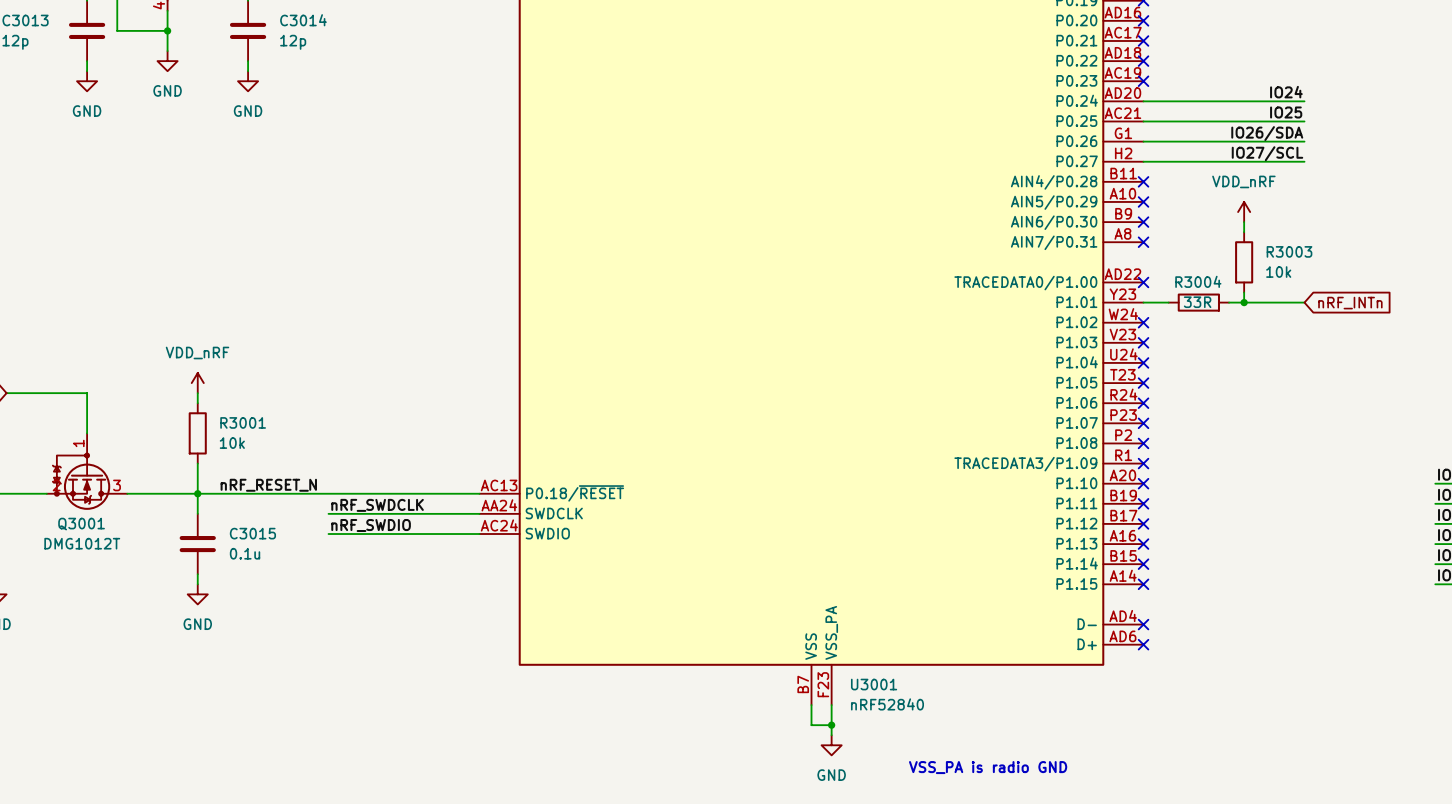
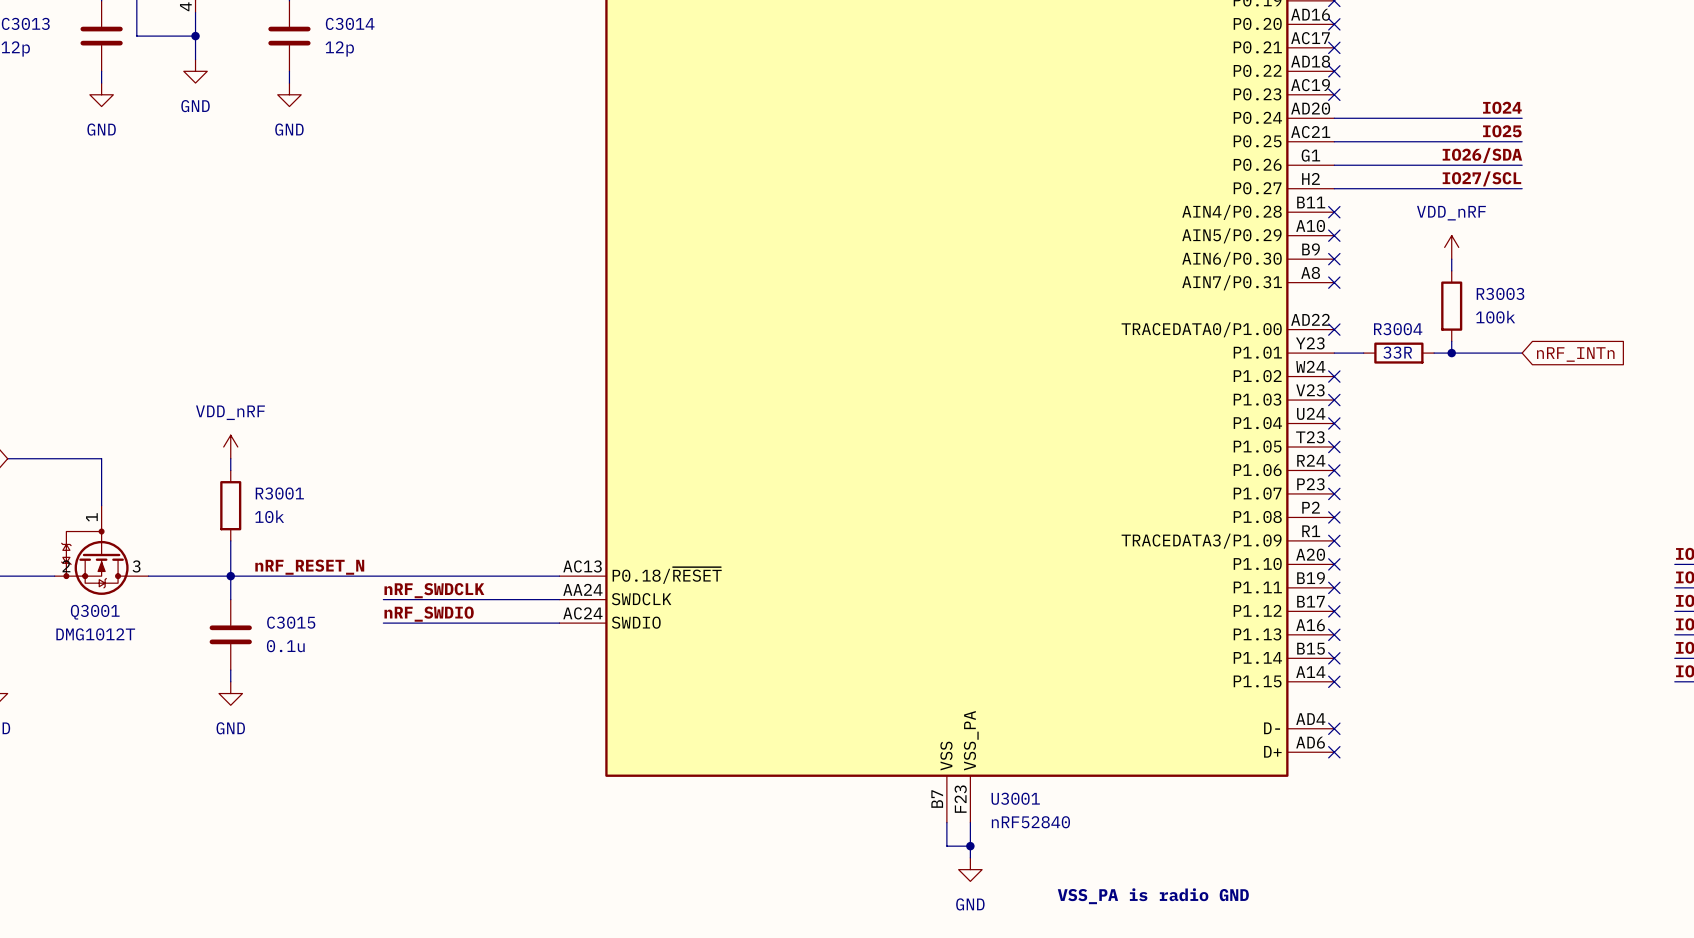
R3003 value: 10k (1278, 272) -> 100k (1495, 317)

